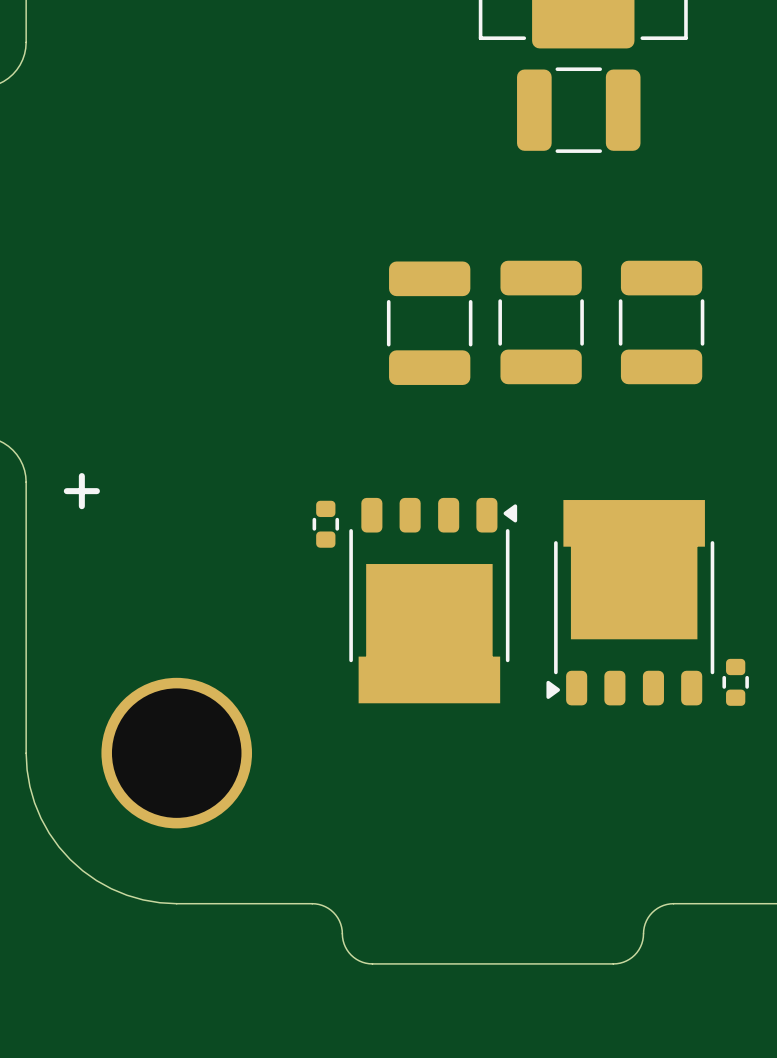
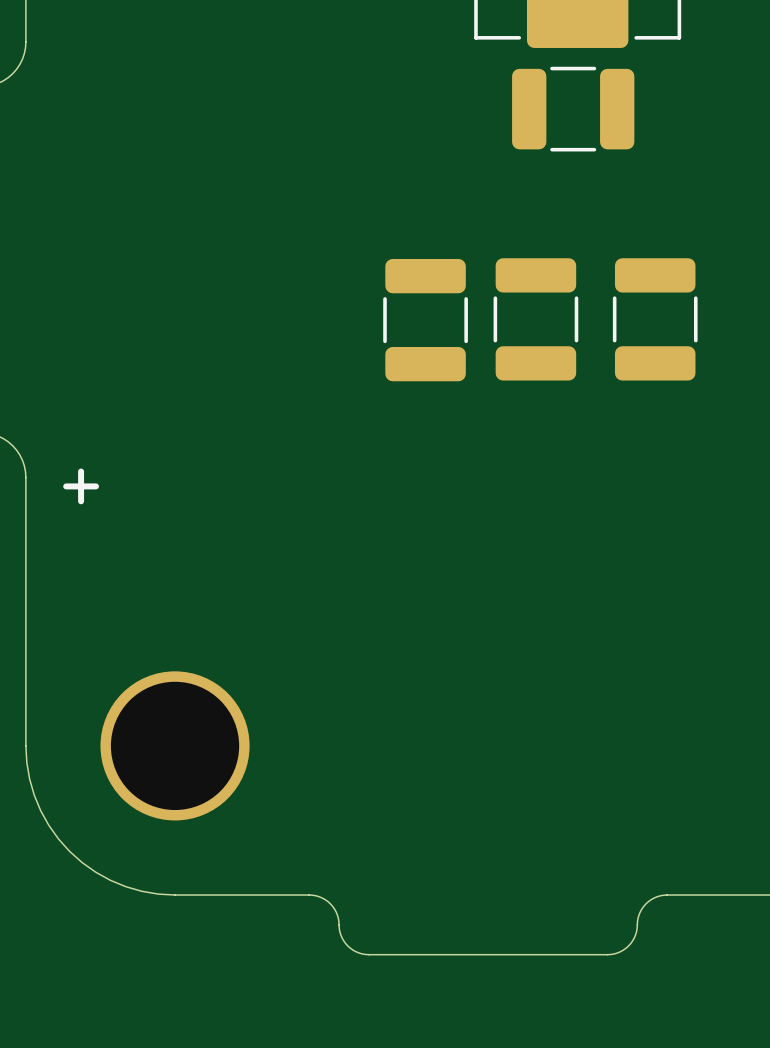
part: (325, 524) -> none
part: (433, 600) -> none
part: (630, 602) -> none
part: (735, 682) -> none

